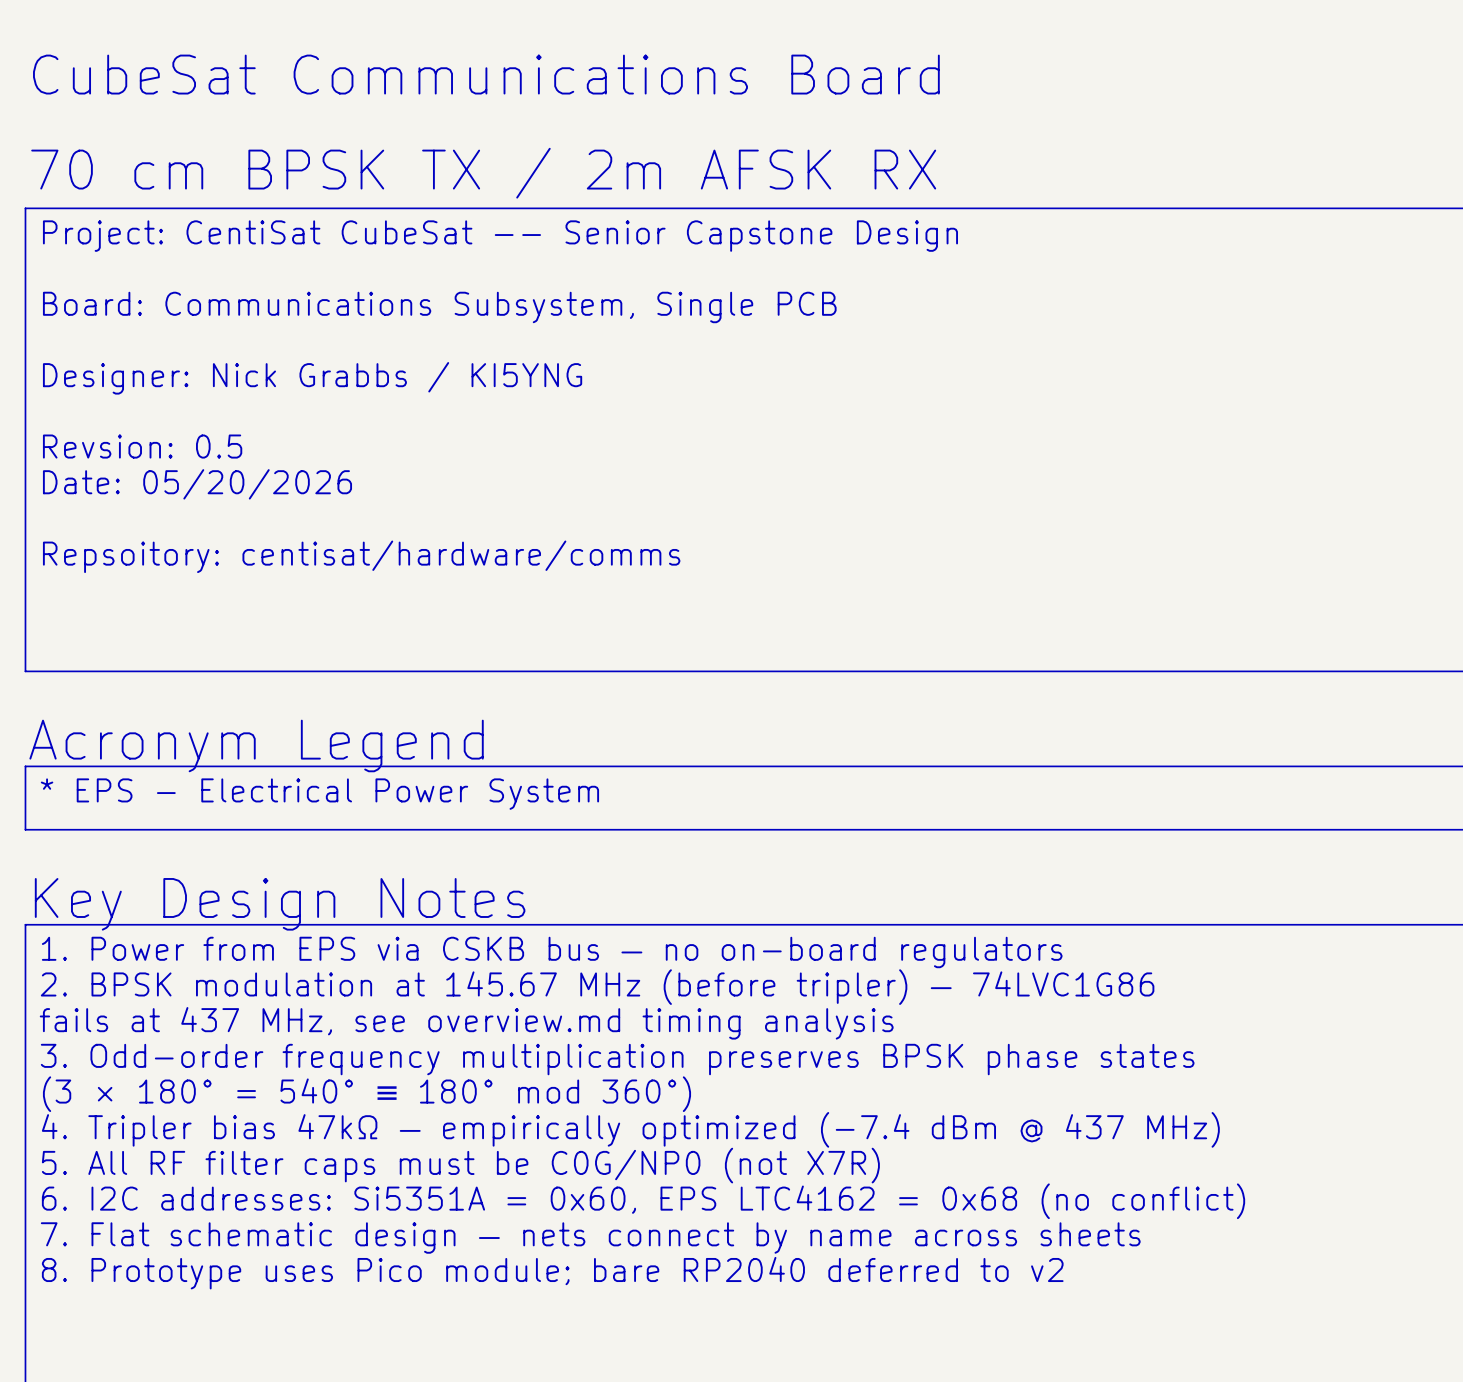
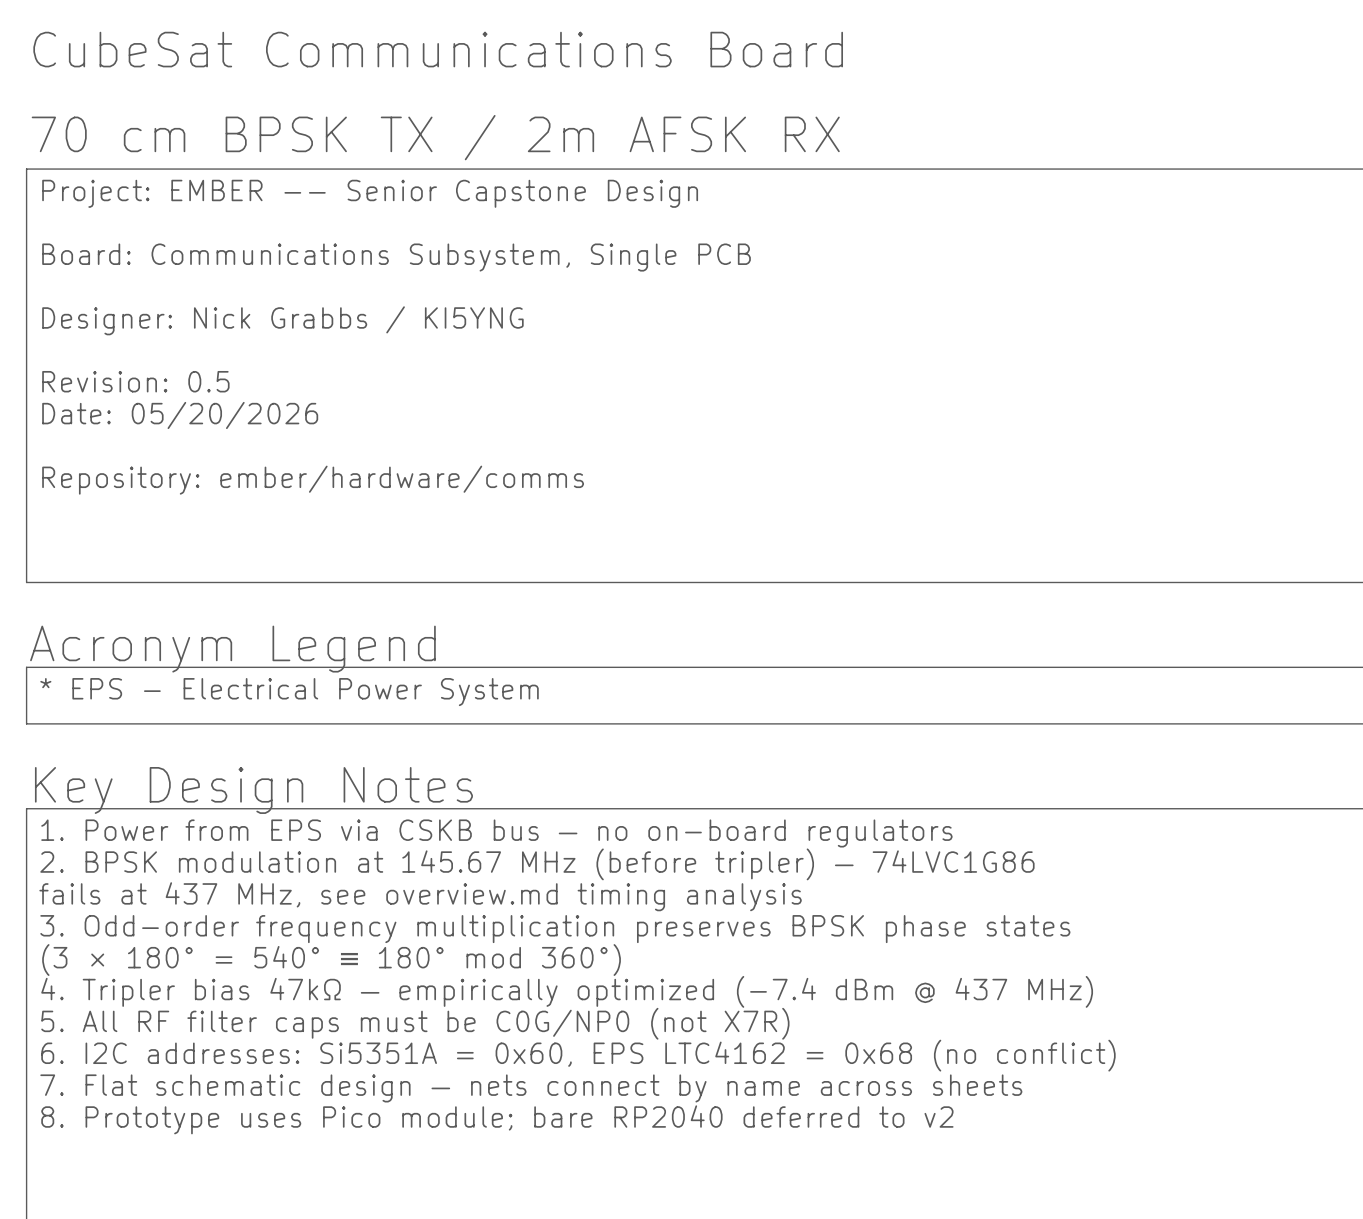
text: Project: CentiSat CubeSat -- Senior Capstone Design (500, 236) -> Project: EMBER -- Senior Capstone Design (370, 193)
text: Revsion: 0.5 (142, 446) -> Revision: 0.5 (135, 381)
text: Repsoitory: centisat/hardware/comms (361, 556) -> Repository: ember/hardware/comms (313, 480)

